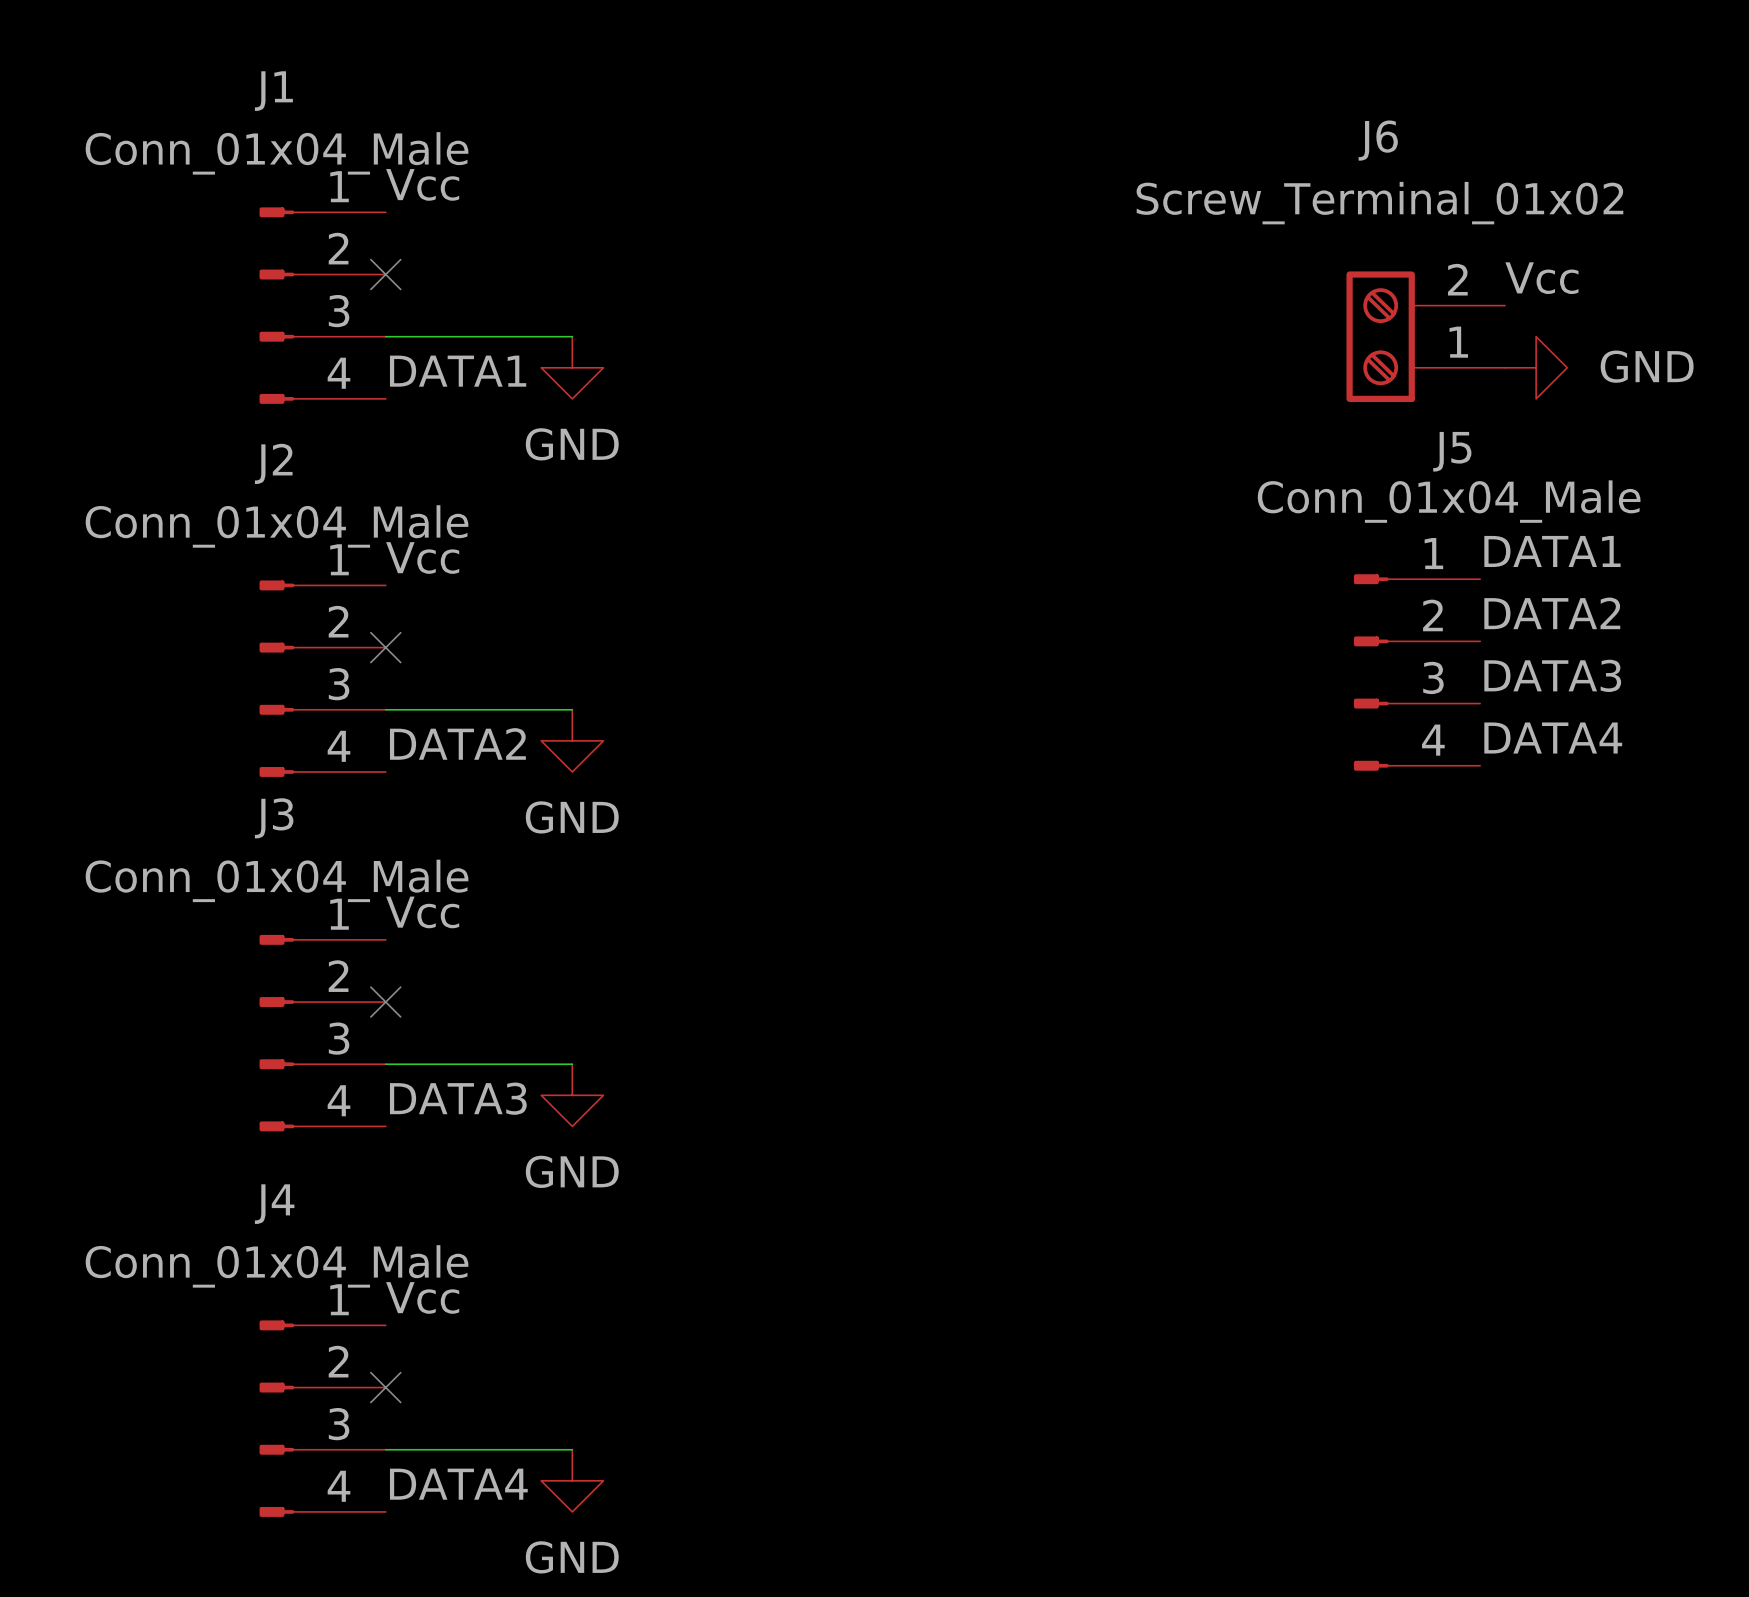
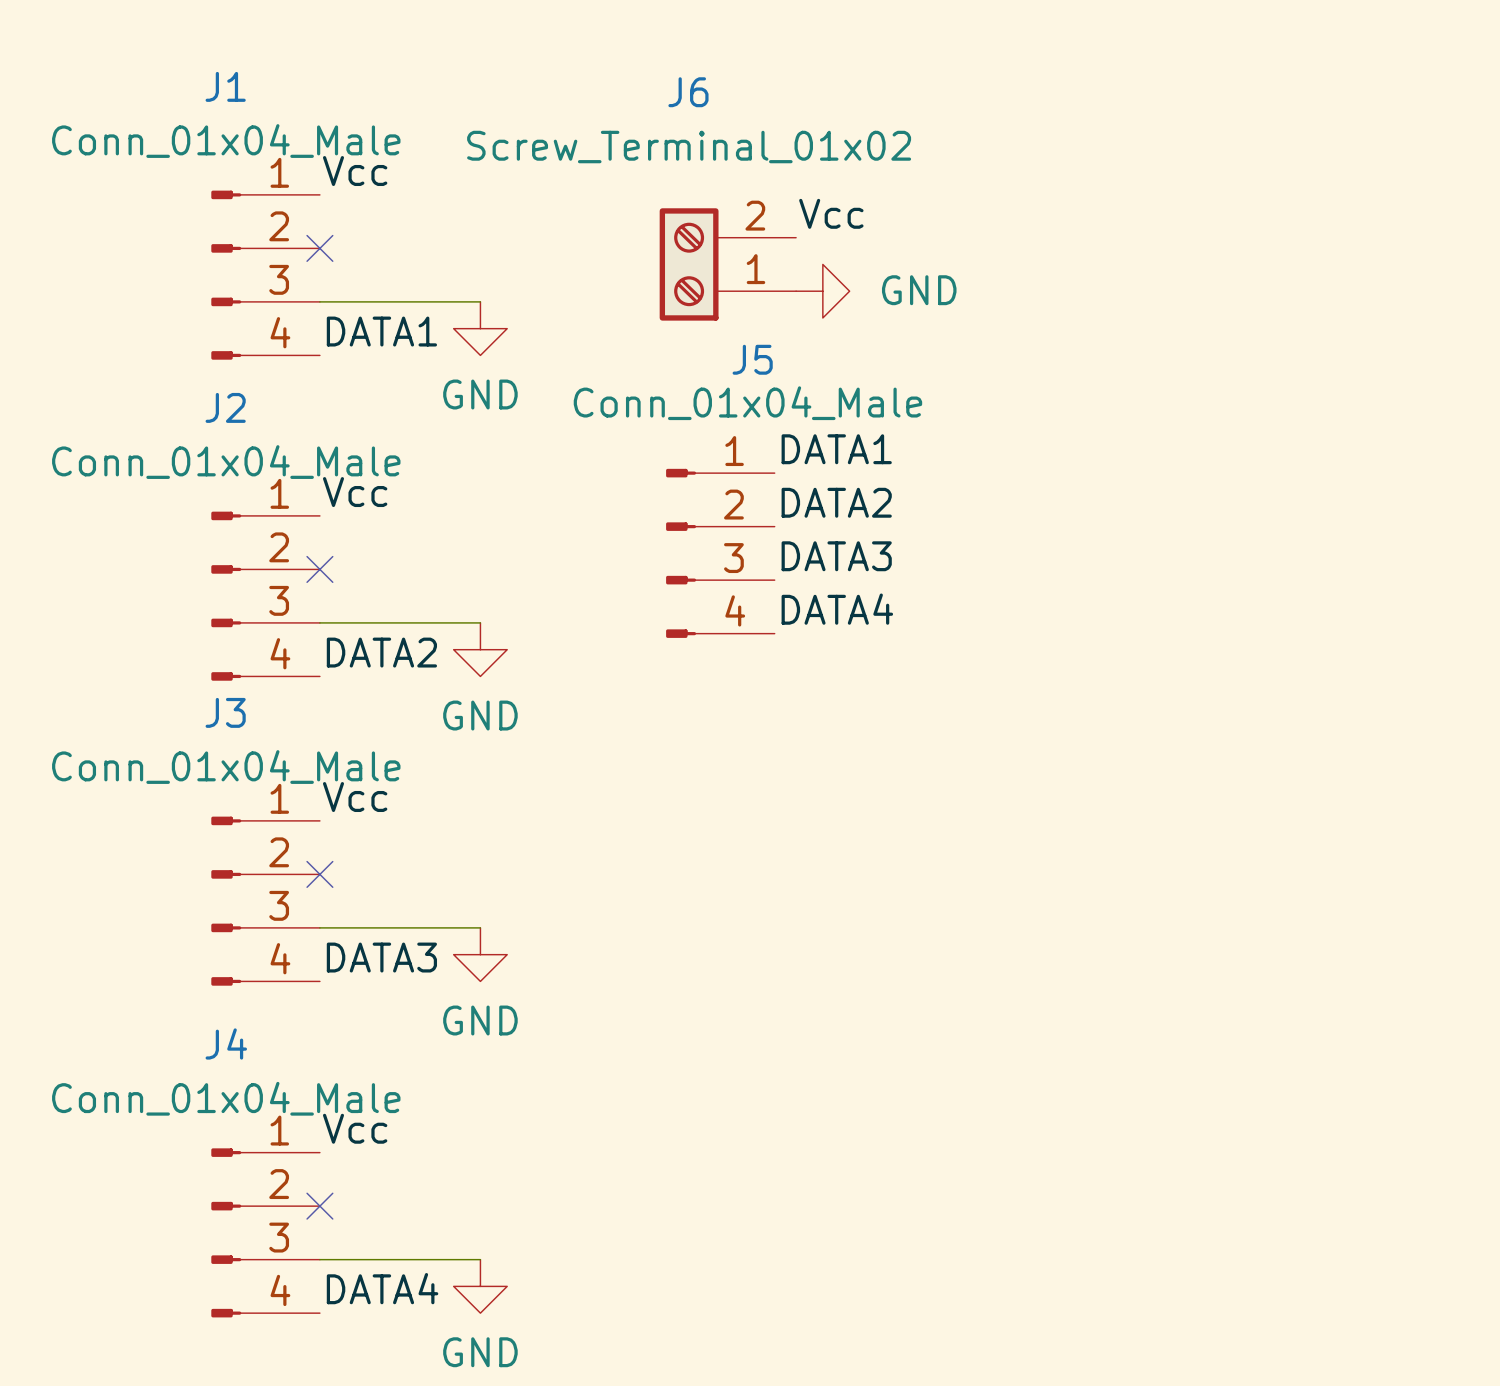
label position: Vcc (1541, 278) -> Vcc (831, 213)
J6 position: (1425, 336) -> (727, 264)
power symbol position: GND (1536, 367) -> GND (822, 291)
label position: DATA1 (1552, 551) -> DATA1 (836, 449)
label position: DATA2 (1552, 613) -> DATA2 (836, 502)
J5 position: (1417, 672) -> (720, 553)
label position: DATA3 (1552, 675) -> DATA3 (836, 556)
label position: DATA4 (1553, 738) -> DATA4 (837, 609)

